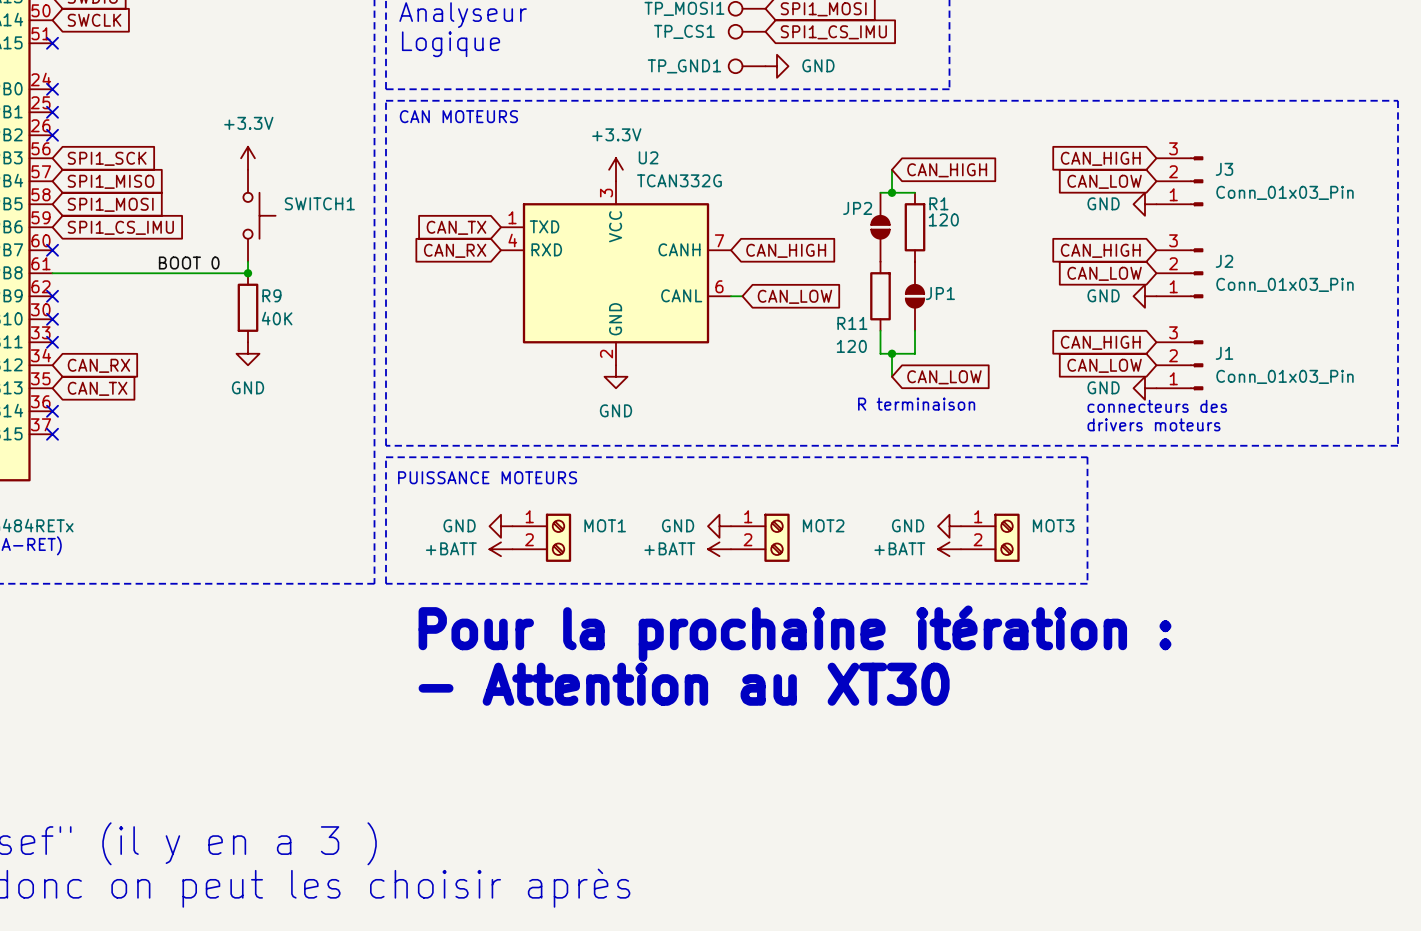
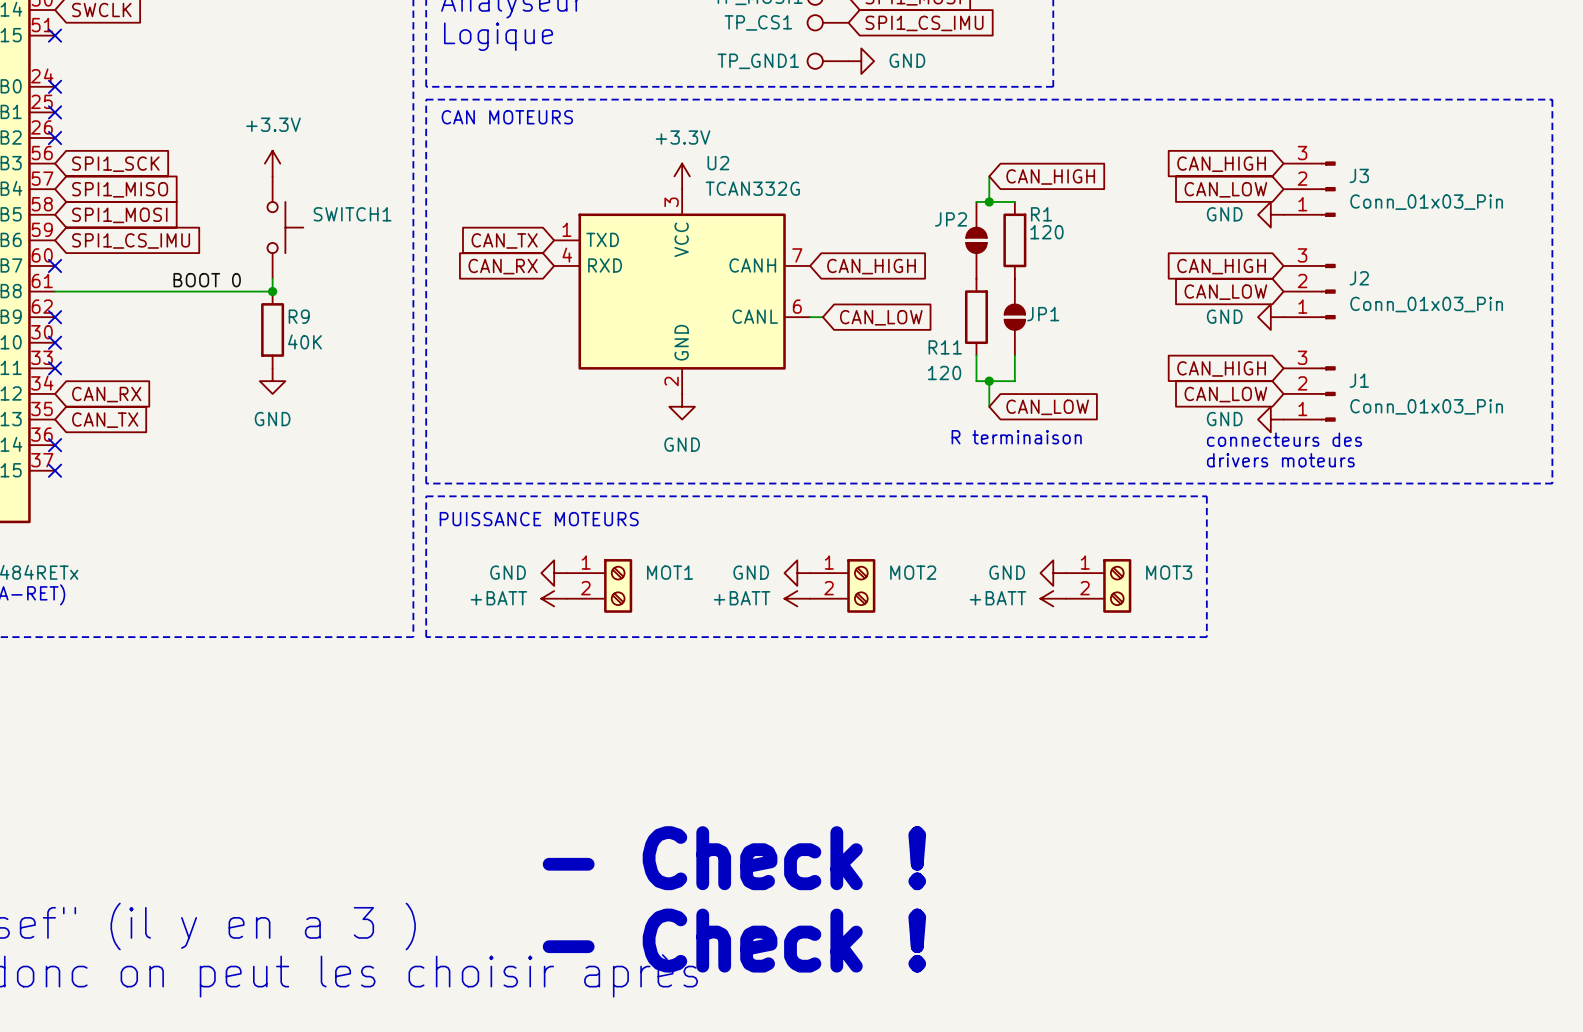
text: Pour la prochaine itération : (794, 633) -> none
text: - Attention au XT30 (684, 684) -> none
text: none -> - Check ! (734, 858)
text: none -> - Check ! (734, 940)

